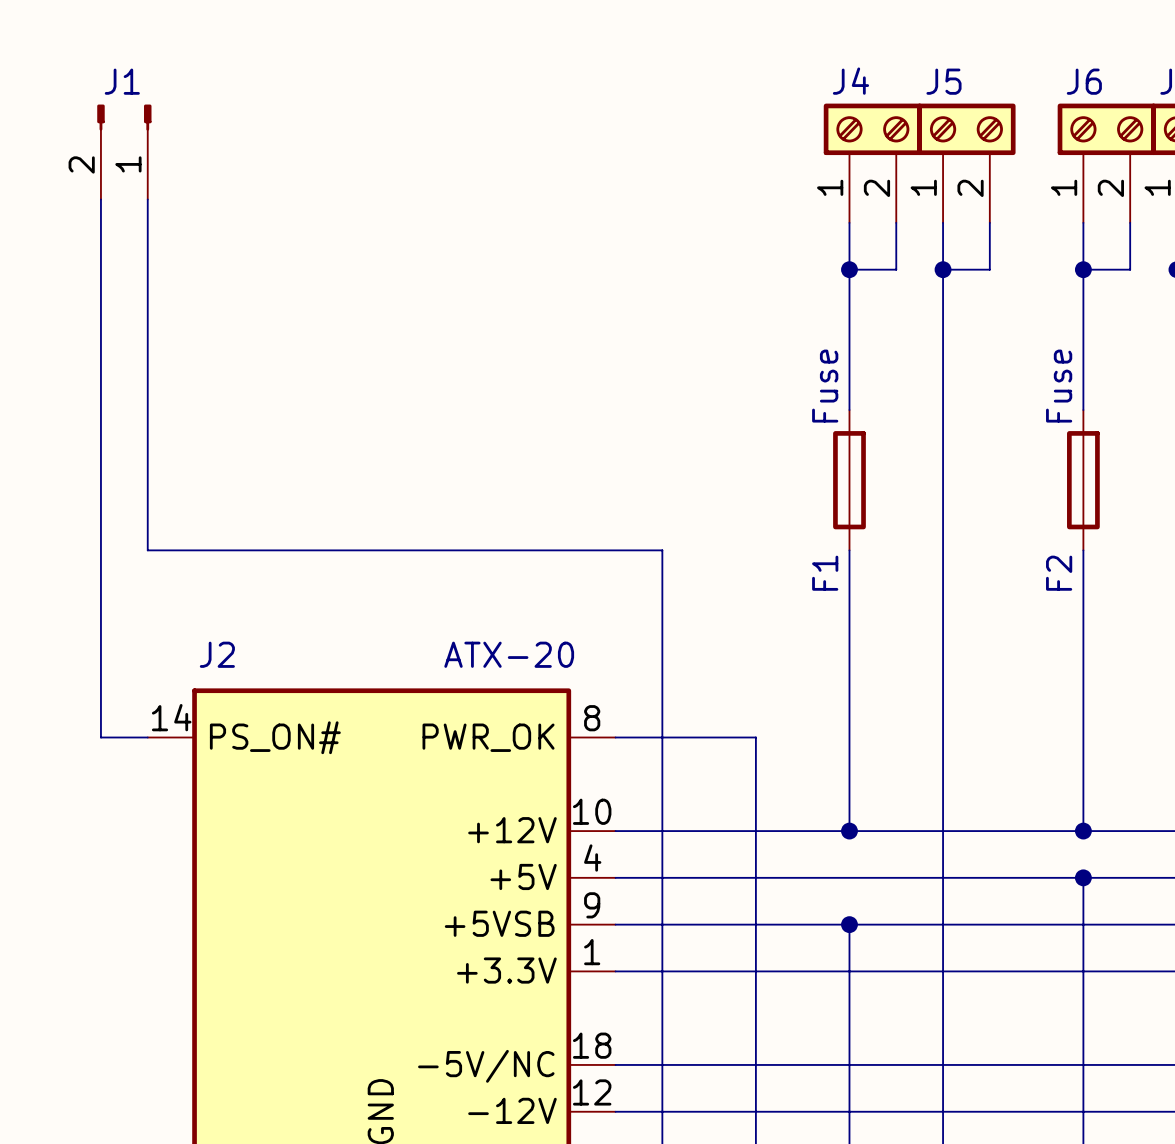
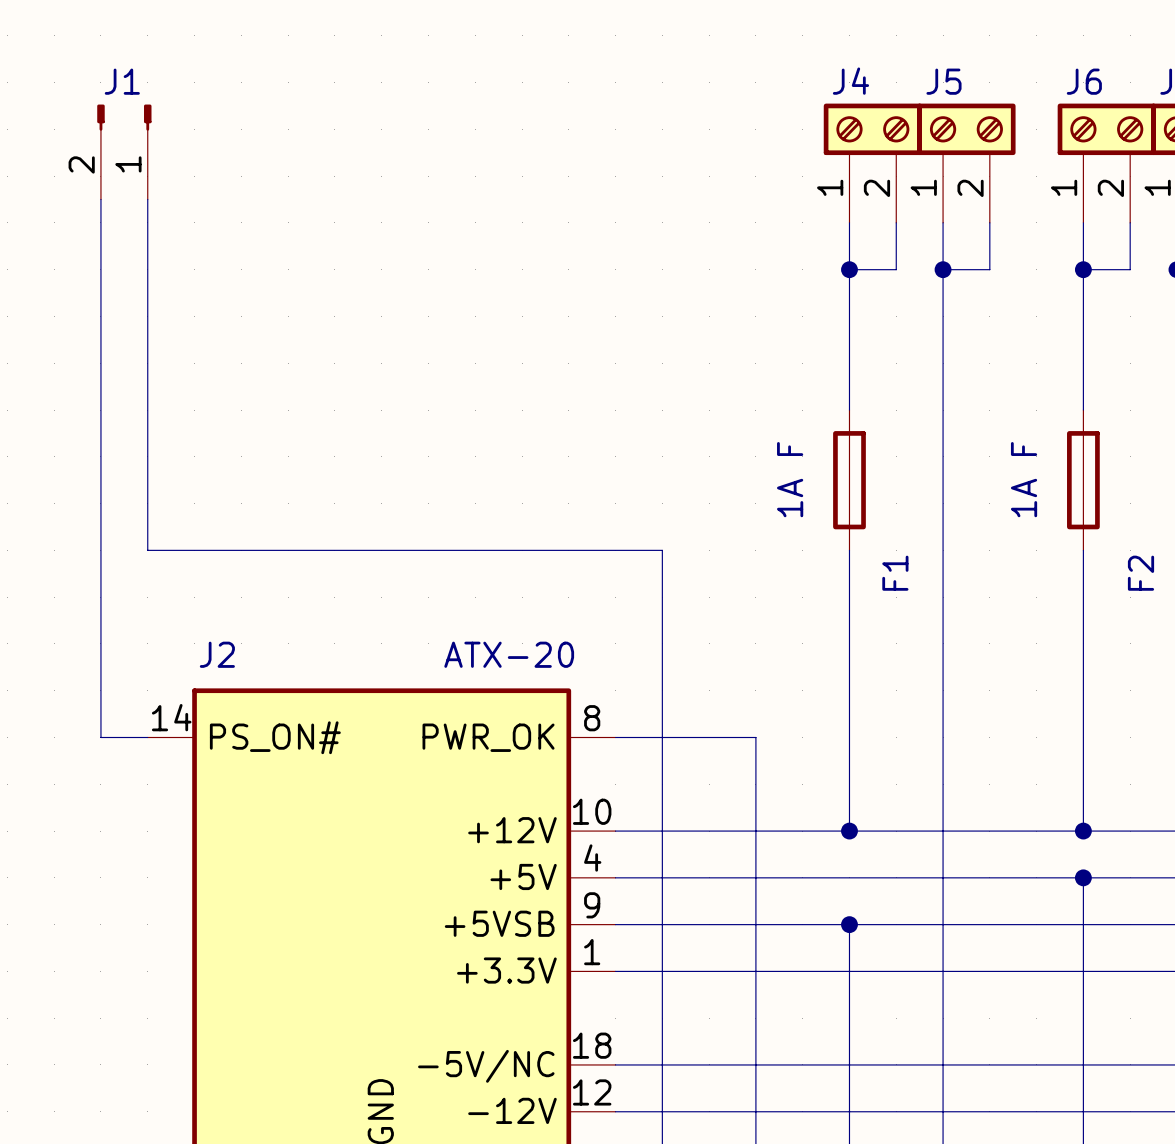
F1 value: Fuse (825, 386) -> 1A F (790, 479)
F2 value: Fuse (1059, 386) -> 1A F (1024, 479)
F1 name position: F1 (825, 573) -> F1 (895, 573)
F2 name position: F2 (1059, 573) -> F2 (1141, 573)

